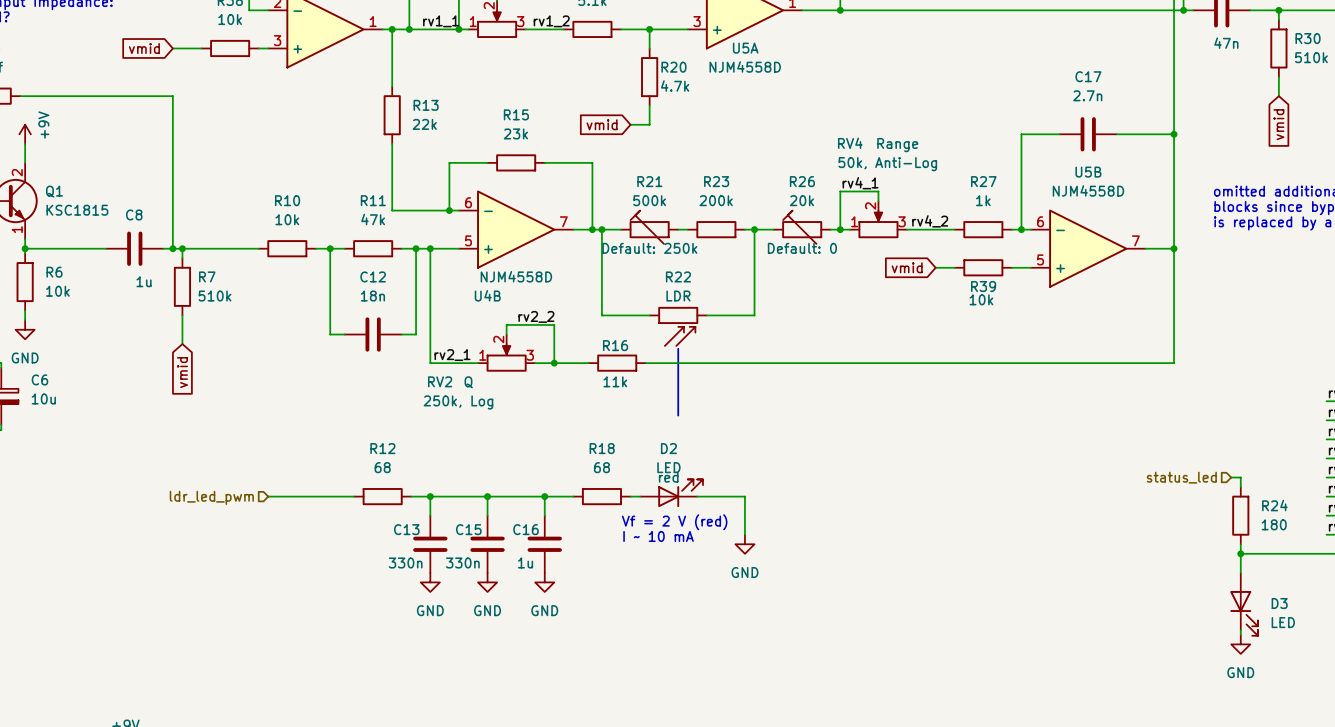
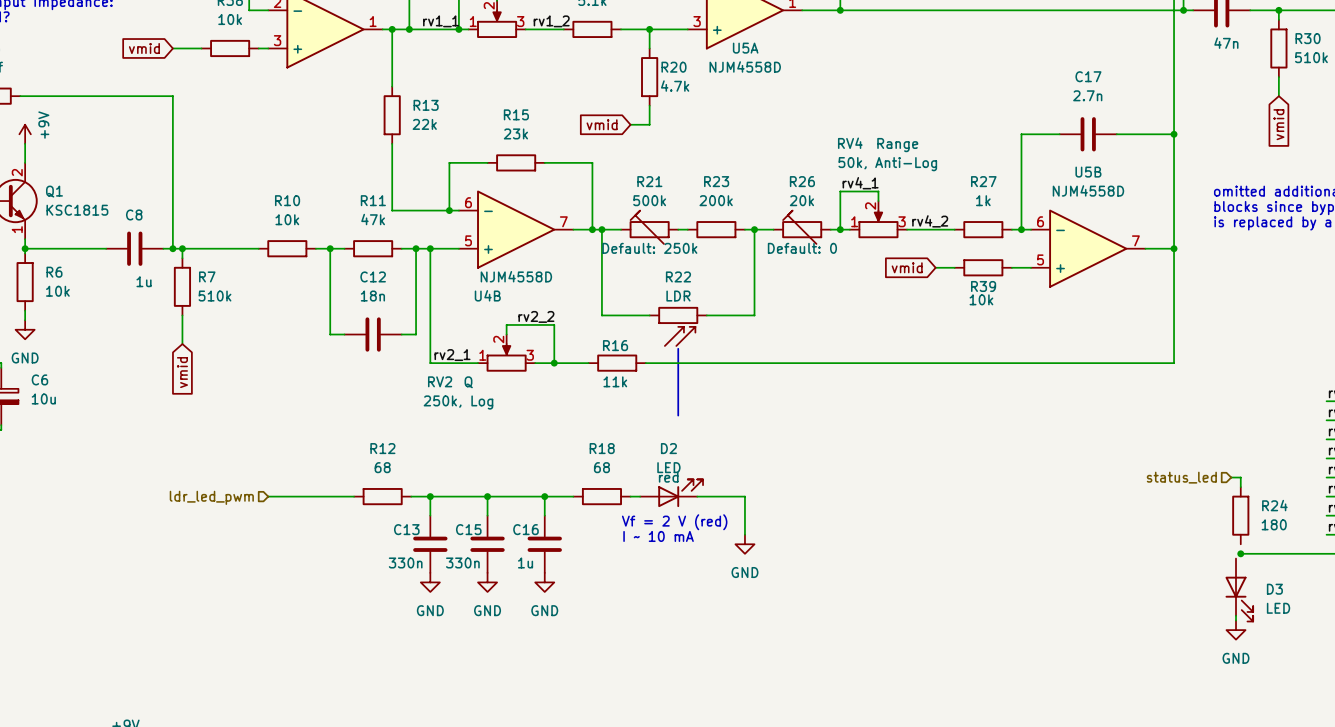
wire: (1240, 544) (1240, 572) -> none
D3 position: (1244, 604) -> (1239, 590)
wire: (1240, 630) (1240, 634) -> (1236, 615) (1236, 620)
power symbol position: GND (1240, 644) -> GND (1236, 630)

